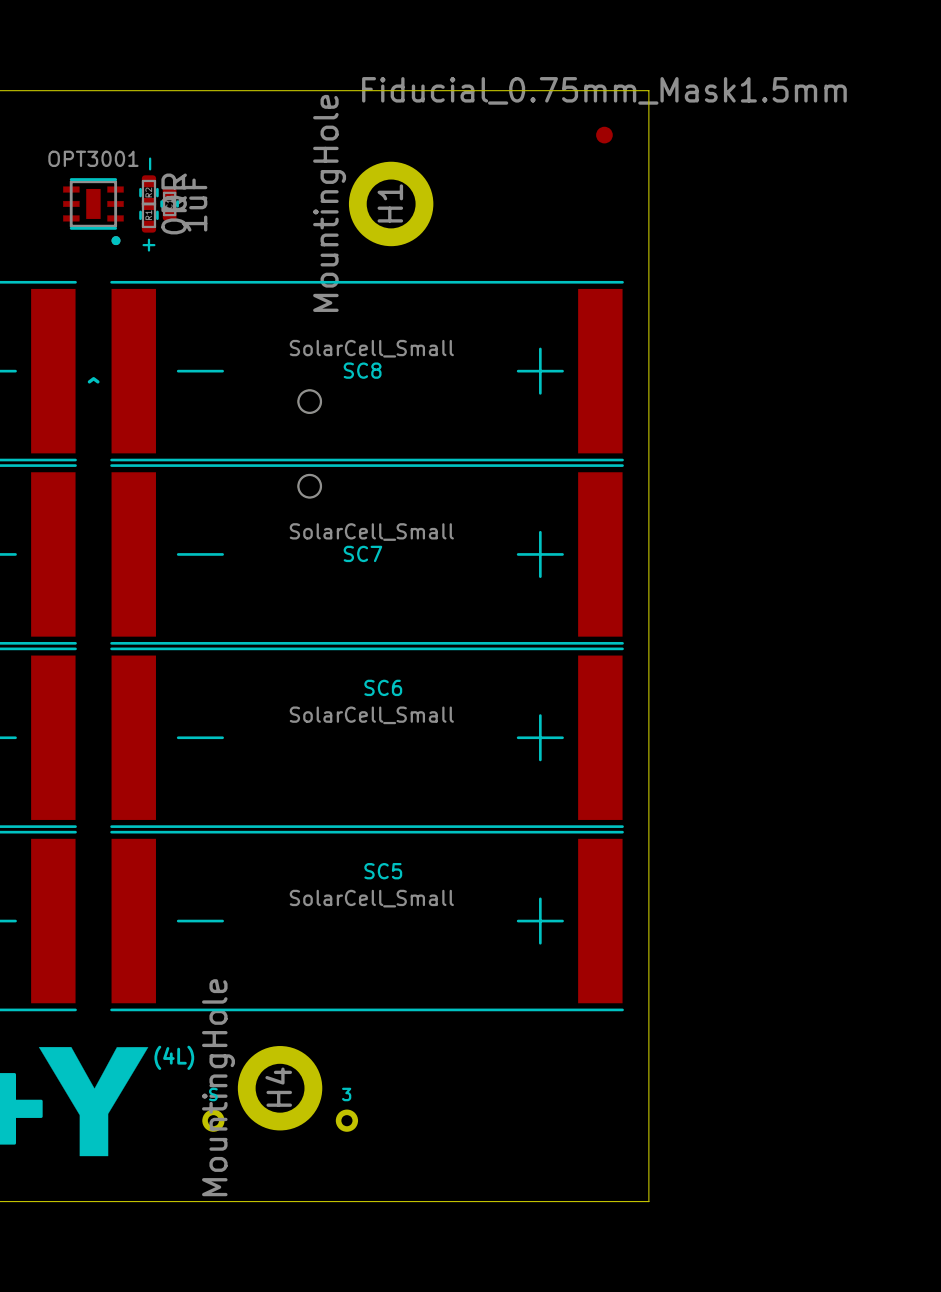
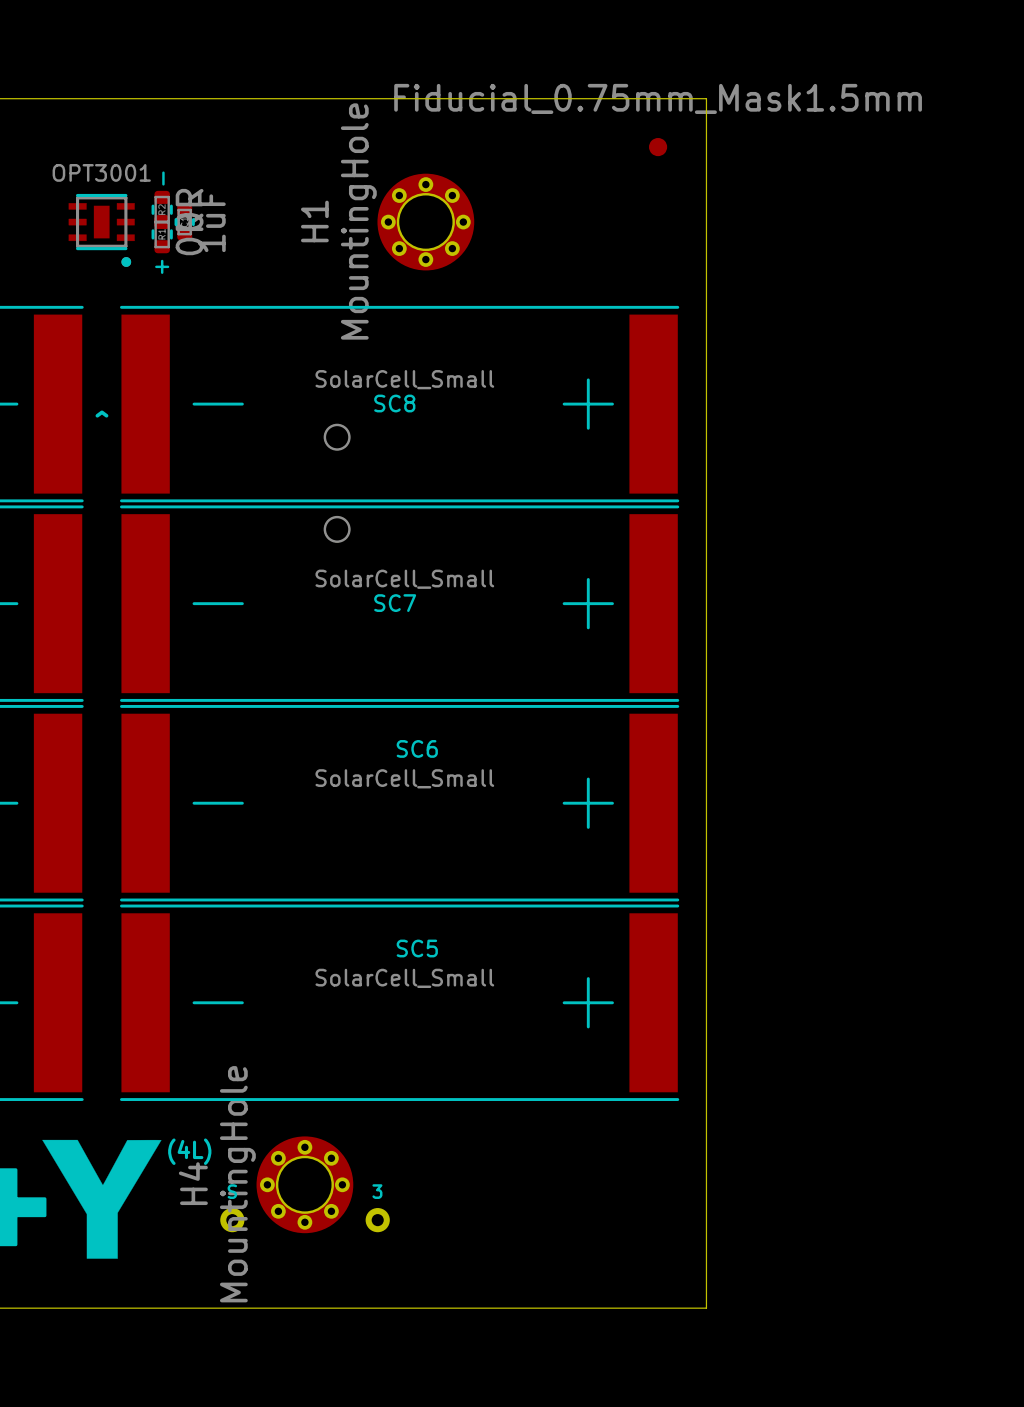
H1 footprint: [348, 161, 434, 247] -> [377, 173, 475, 271]
H1 name position: H1 (390, 203) -> H1 (314, 221)
H4 footprint: [237, 1046, 323, 1131] -> [256, 1136, 354, 1234]
H4 name position: H4 (278, 1087) -> H4 (193, 1183)

